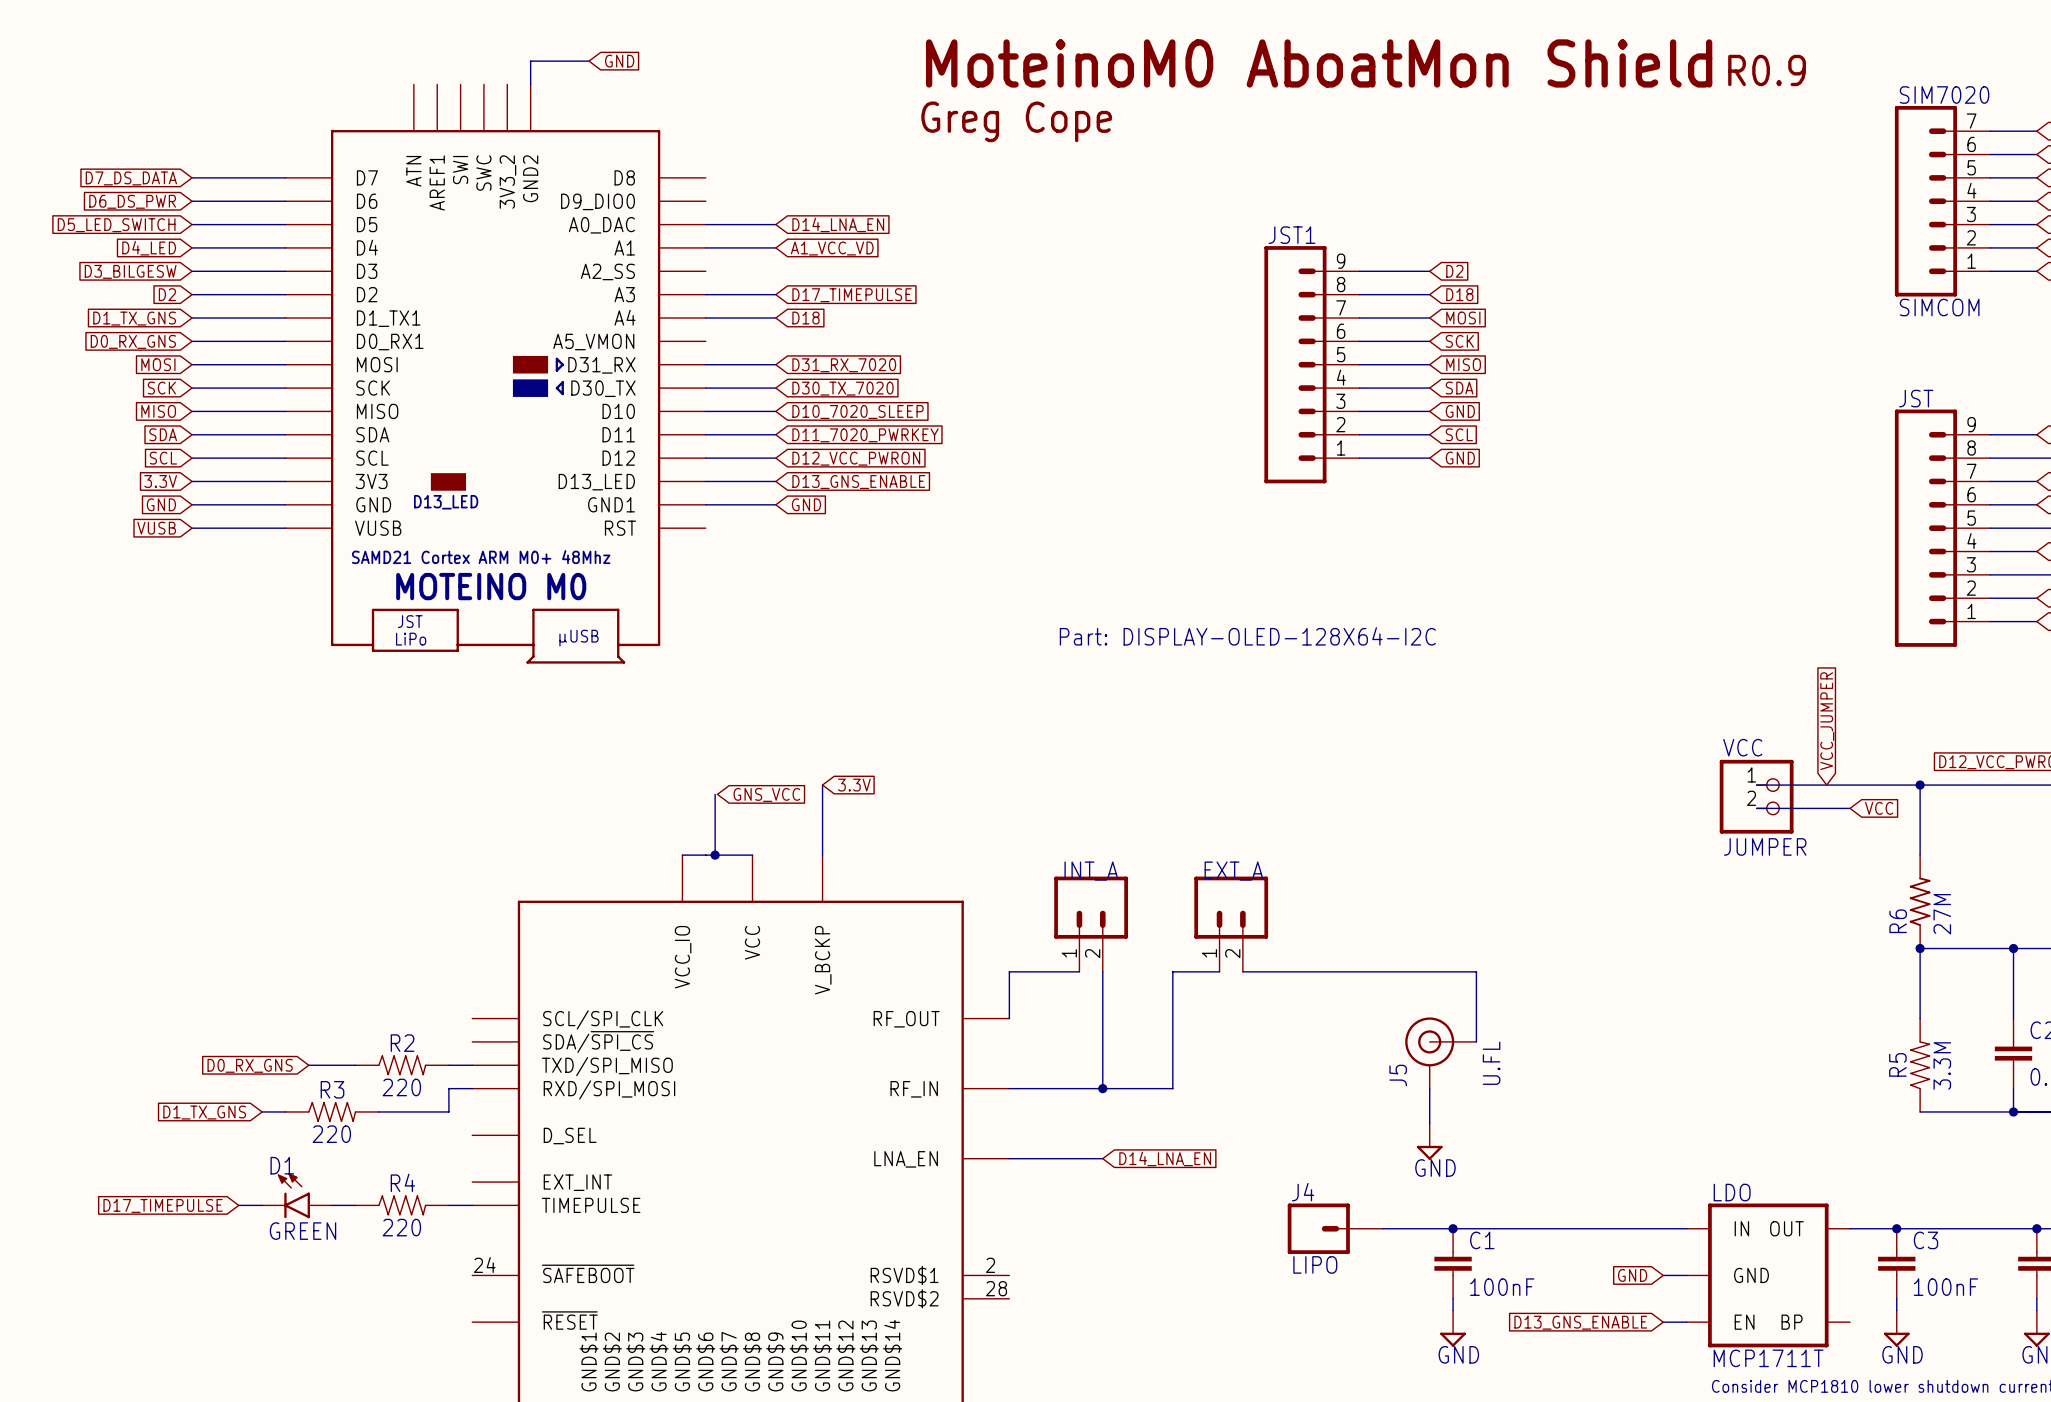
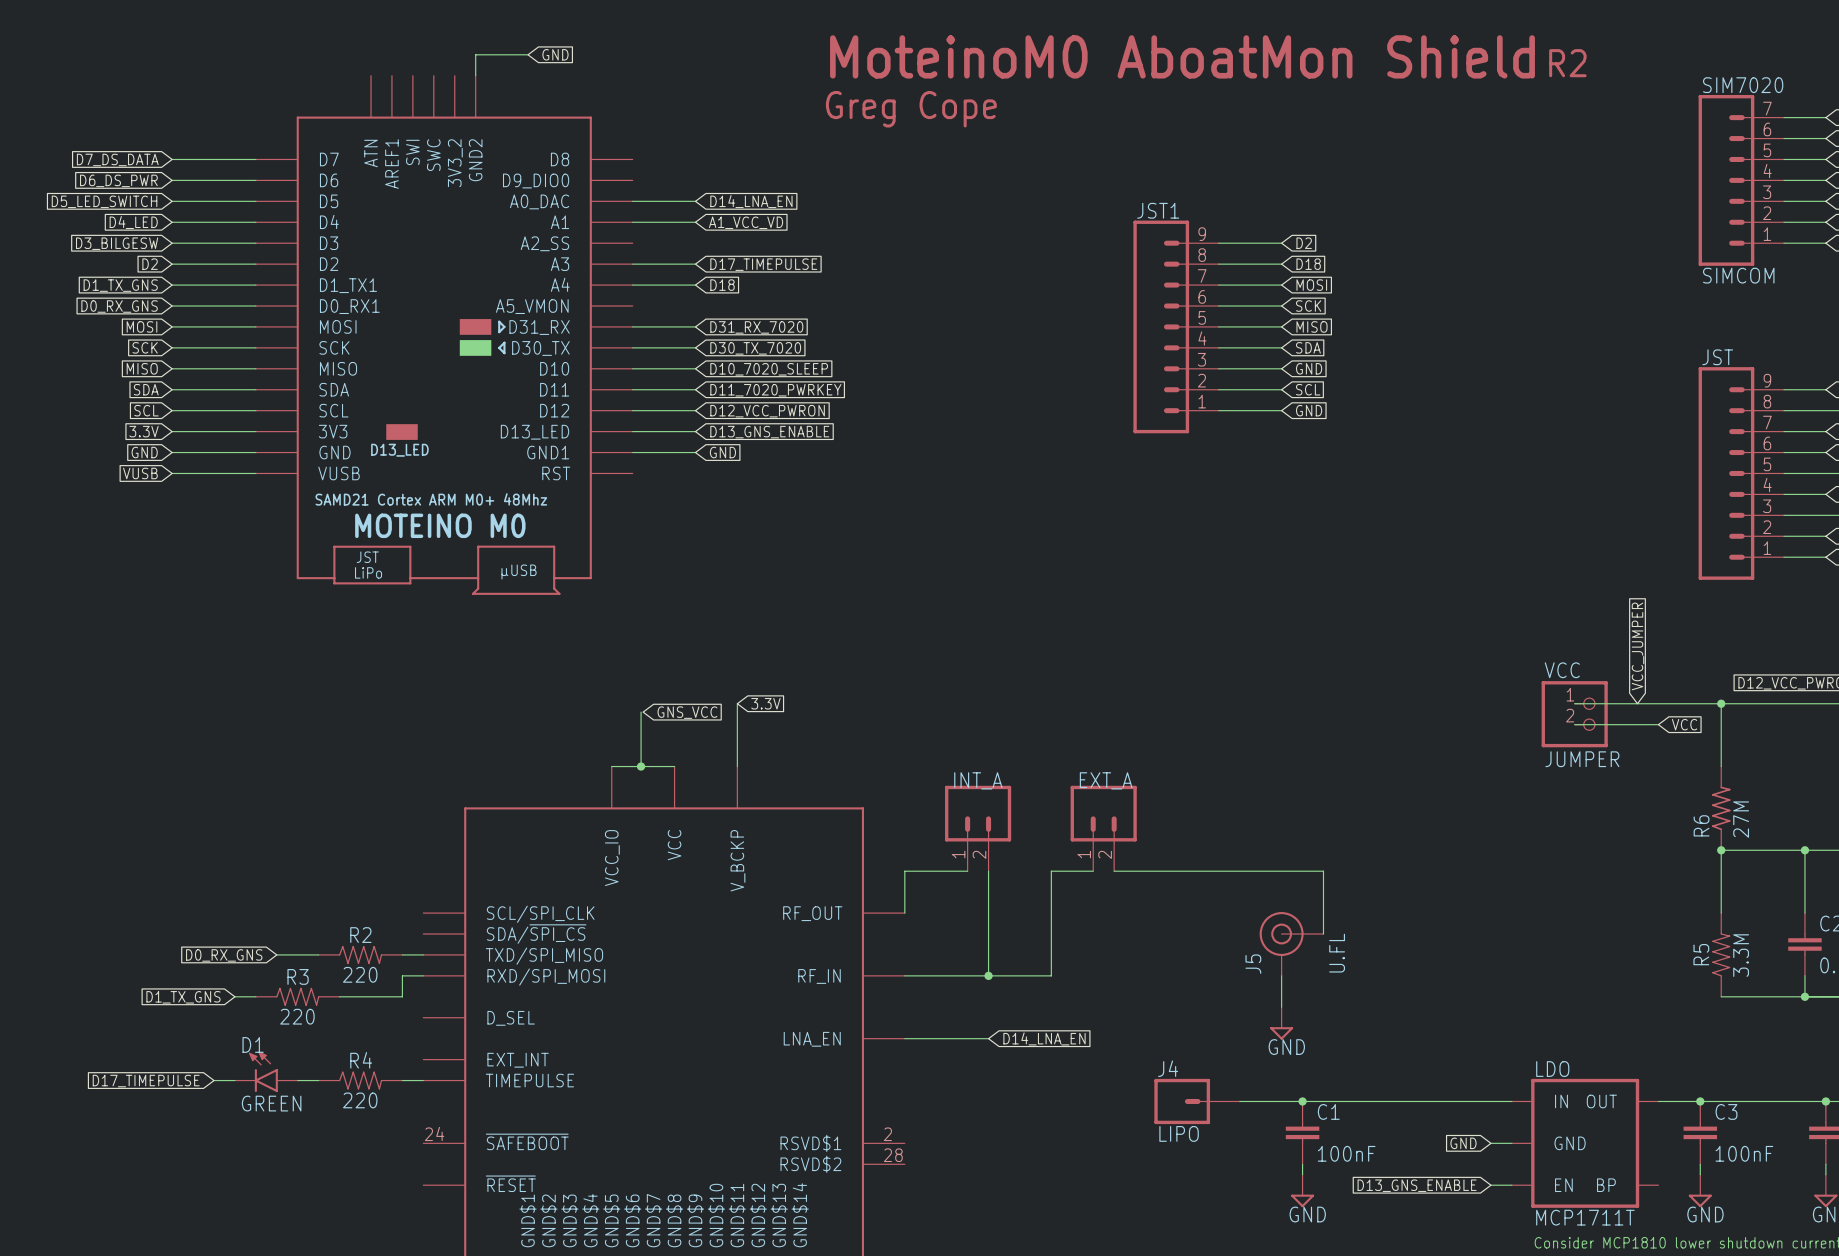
text: R0.9 (1767, 70) -> R2 (1567, 63)
text: Part: DISPLAY-OLED-128X64-I2C (1247, 636) -> none

